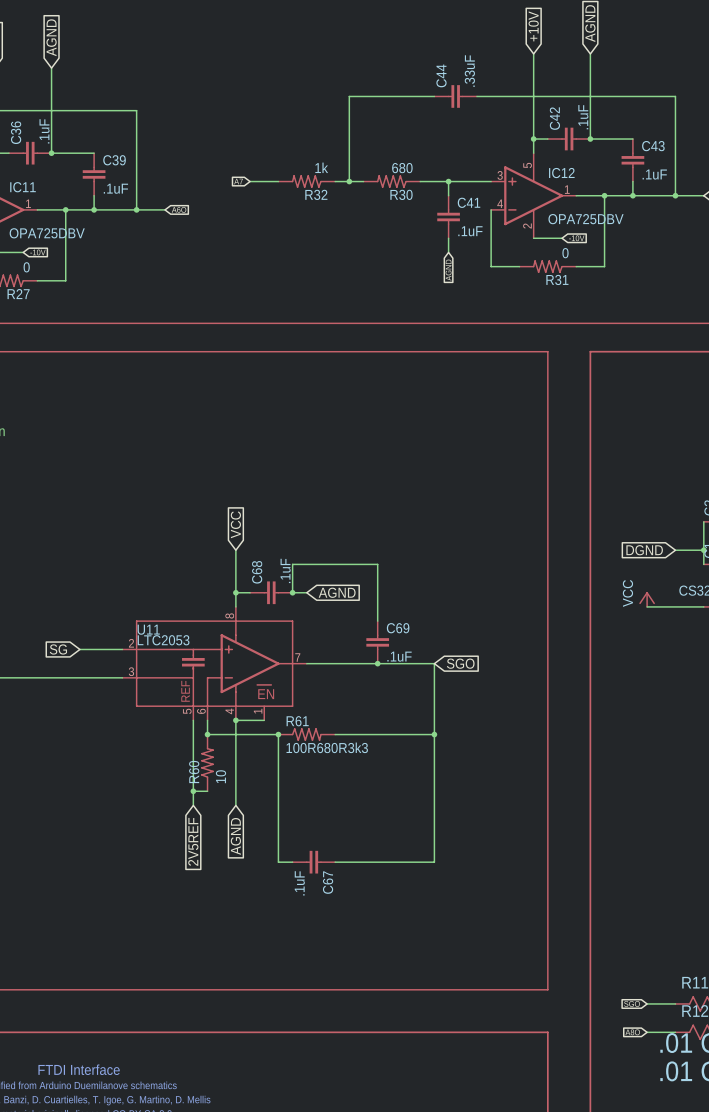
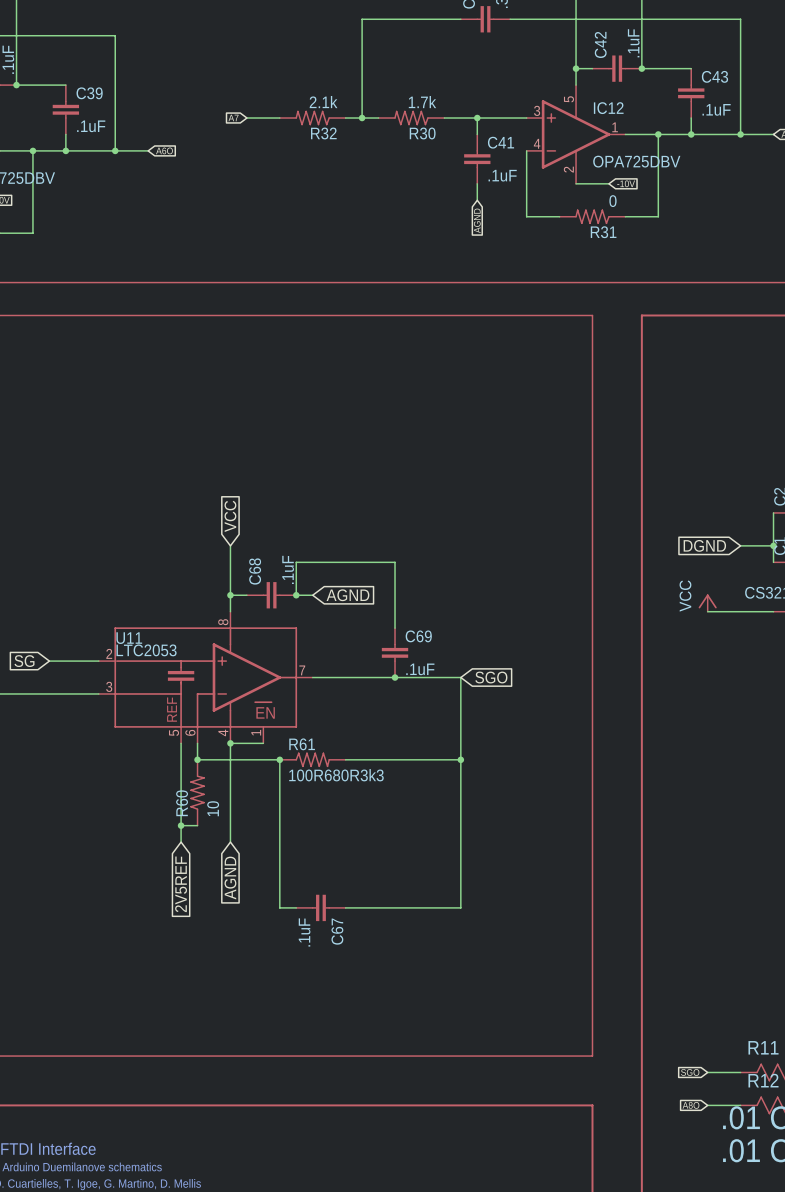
R32 value: 1k (321, 167) -> 2.1k (323, 102)
R30 value: 680 (402, 168) -> 1.7k (422, 102)

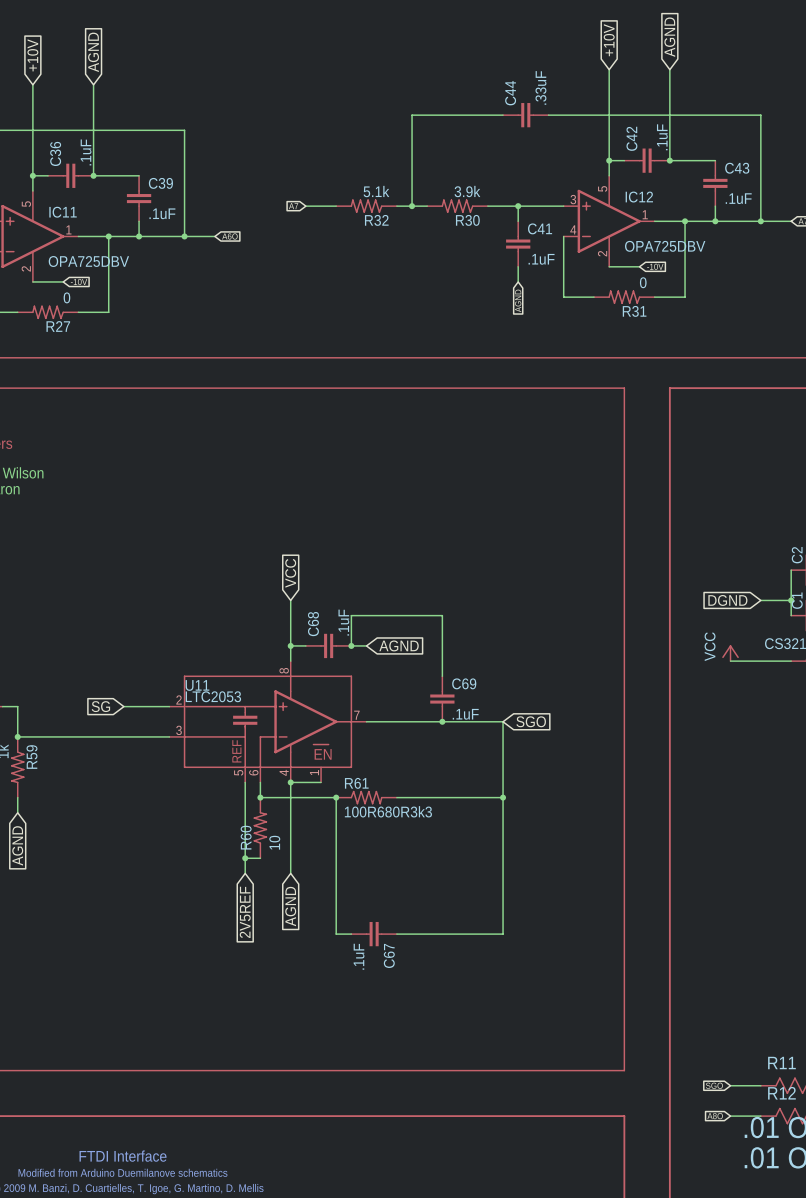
R32 value: 2.1k (323, 102) -> 5.1k (376, 191)
R30 value: 1.7k (422, 102) -> 3.9k (467, 191)

